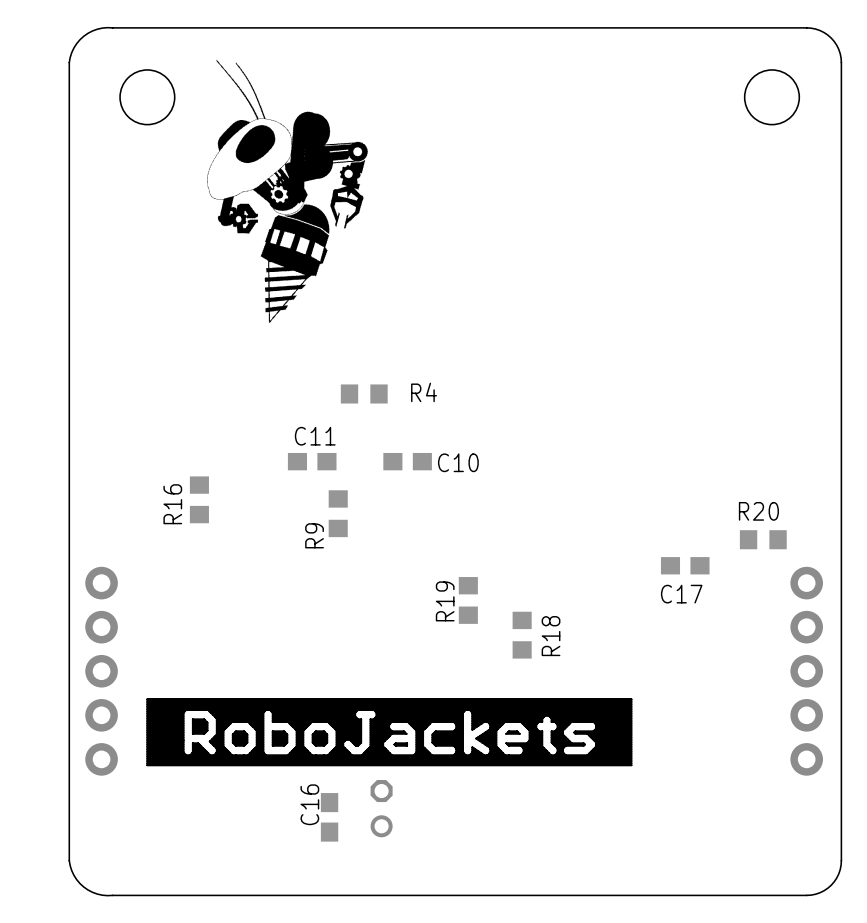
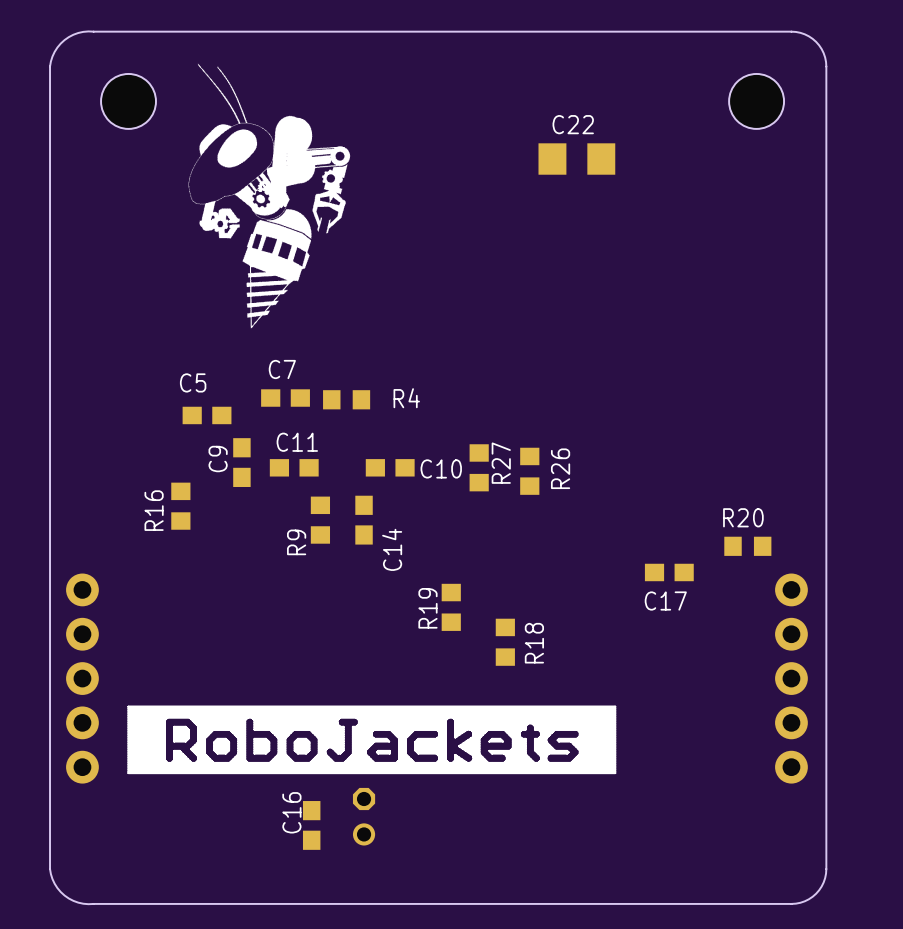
C22: none -> (576, 159)
C7: none -> (285, 398)
C5: none -> (207, 415)
C9: none -> (241, 462)
R27: none -> (479, 467)
R26: none -> (529, 471)
C14: none -> (364, 520)

